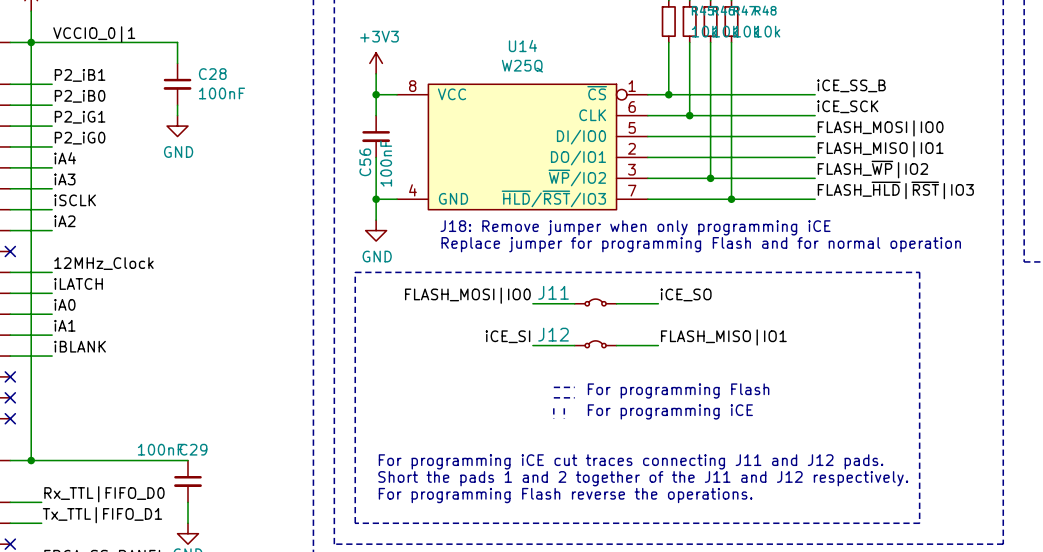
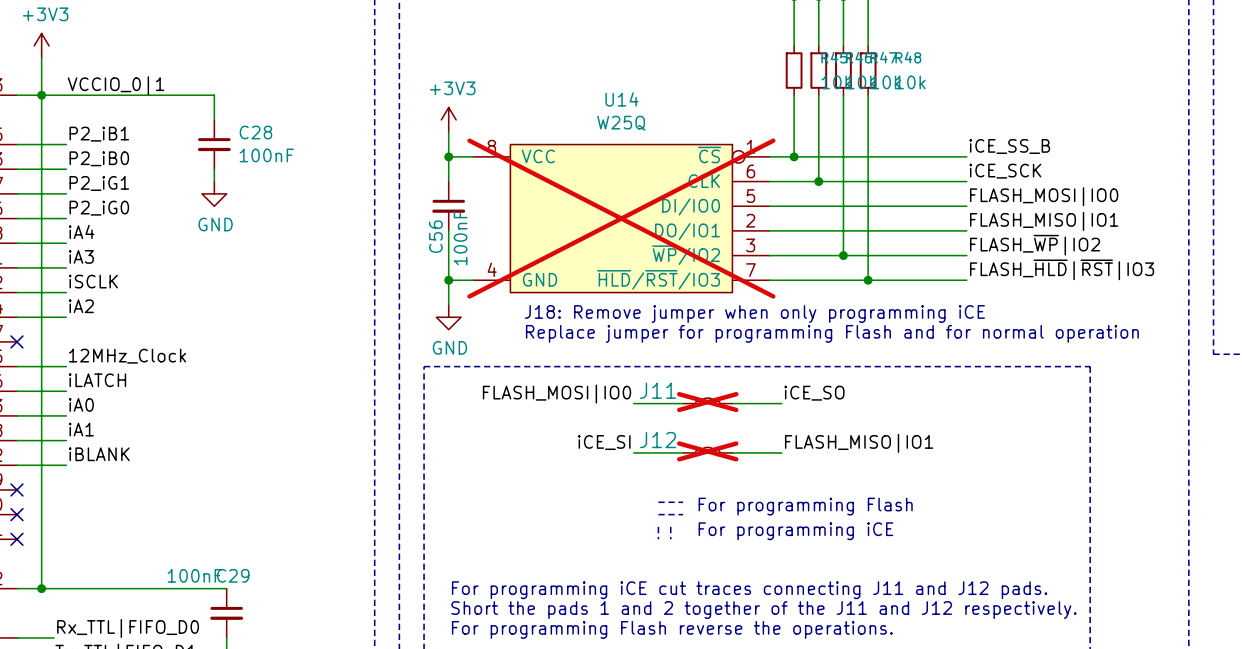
U14 do-not-place cross: none -> (621, 218)
J11 do-not-place cross: none -> (707, 402)
J12 do-not-place cross: none -> (707, 451)

